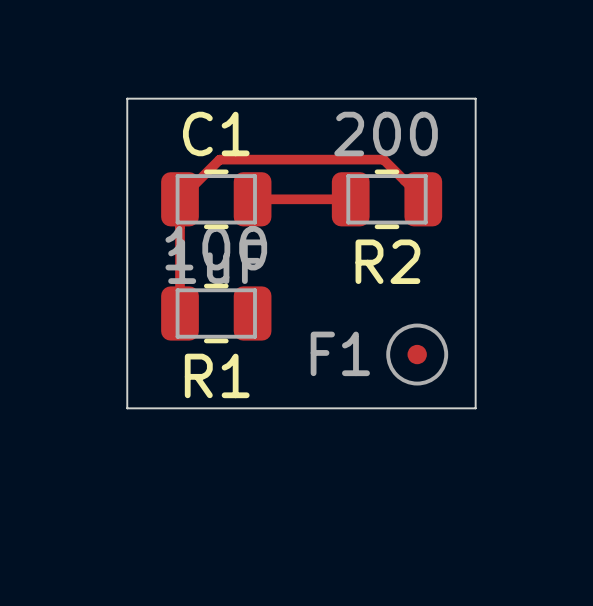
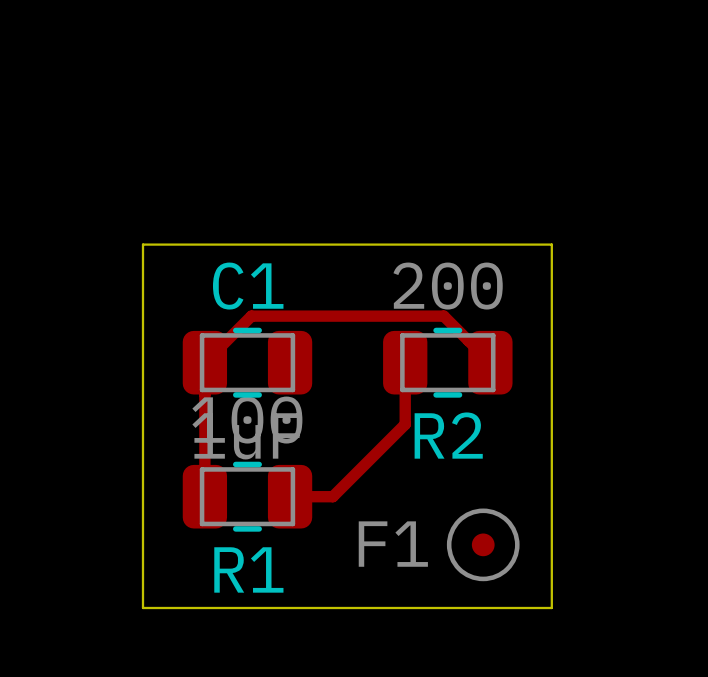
top track: (252, 199) (350, 199) -> (290, 496) (332, 496) (405, 424) (405, 362)

